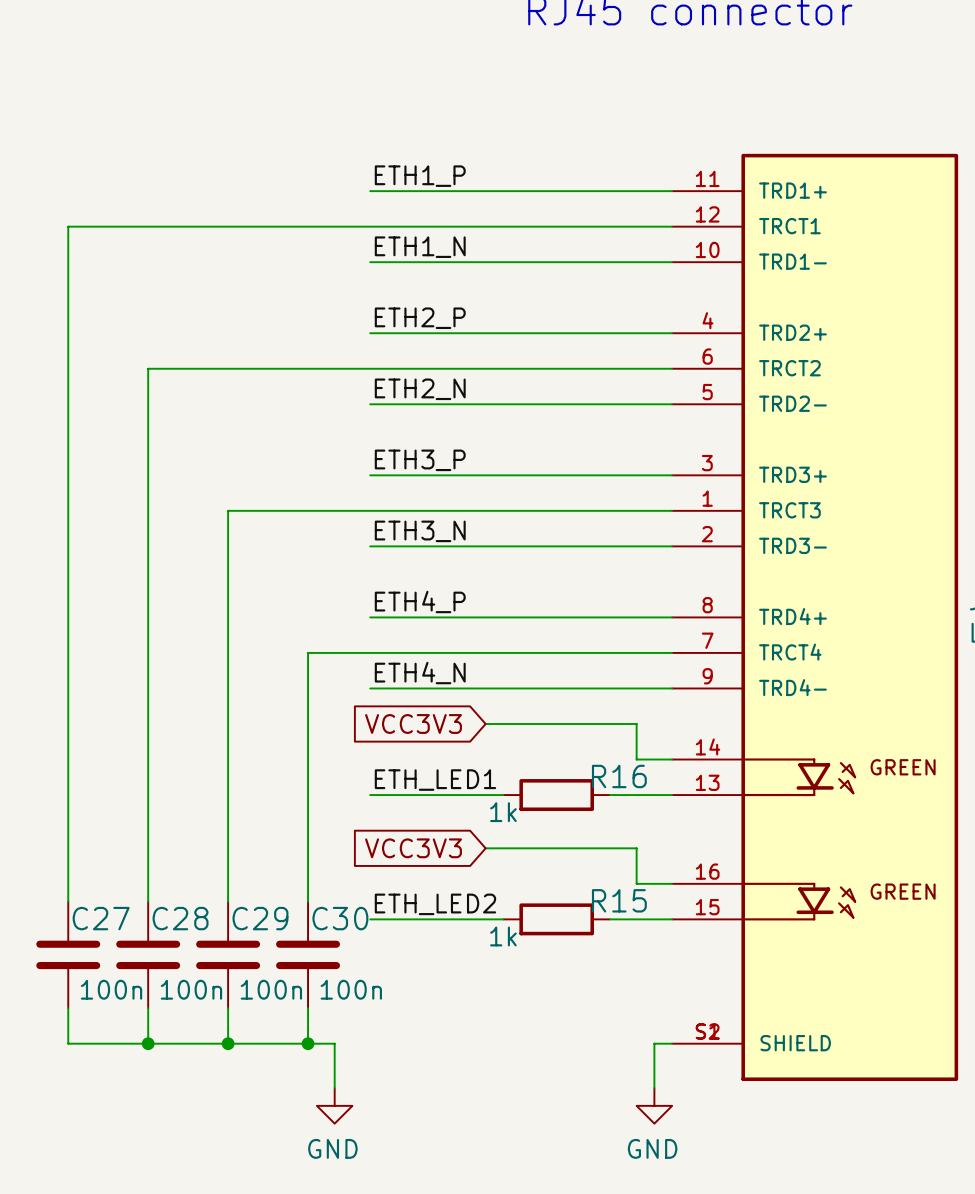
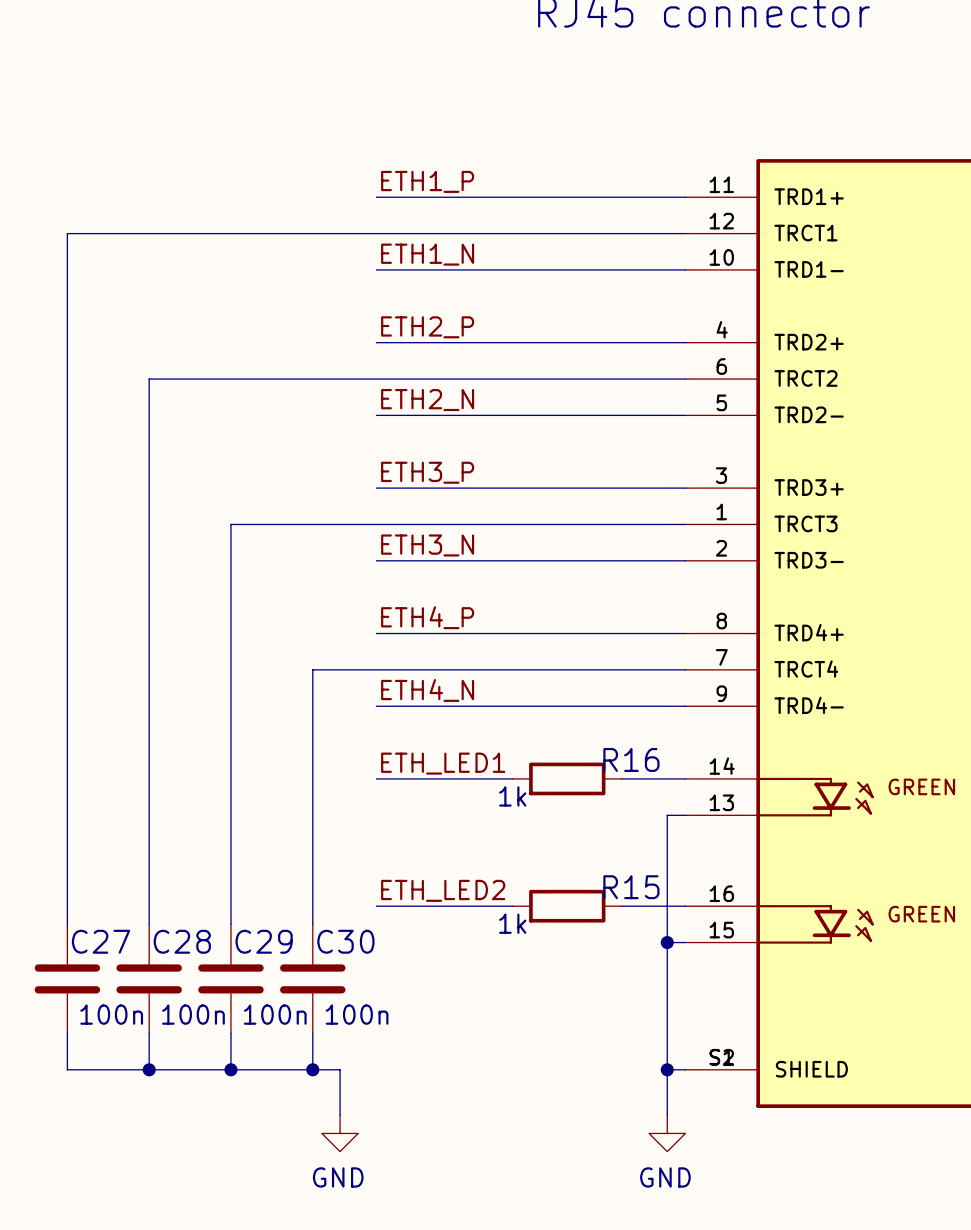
global label: VCC3V3 (413, 723) -> none
wire: (485, 723) (636, 723) (636, 759) -> (621, 778) (649, 778)
label position: ETH_LED1 (435, 780) -> ETH_LED1 (443, 763)
wire: (370, 795) (503, 795) -> (376, 778) (512, 778)
R16 position: (556, 795) -> (567, 778)
wire: (609, 795) (654, 795) -> (667, 1069) (667, 815)
global label: VCC3V3 (413, 848) -> none
wire: (485, 848) (636, 848) (636, 883) -> (621, 906) (649, 906)
label position: ETH_LED2 (435, 904) -> ETH_LED2 (443, 890)
wire: (370, 919) (503, 919) -> (376, 906) (512, 906)
R15 position: (556, 919) -> (567, 906)
wire: (609, 919) (654, 919) -> none
junction: none -> (667, 942)
junction: none -> (667, 1069)

